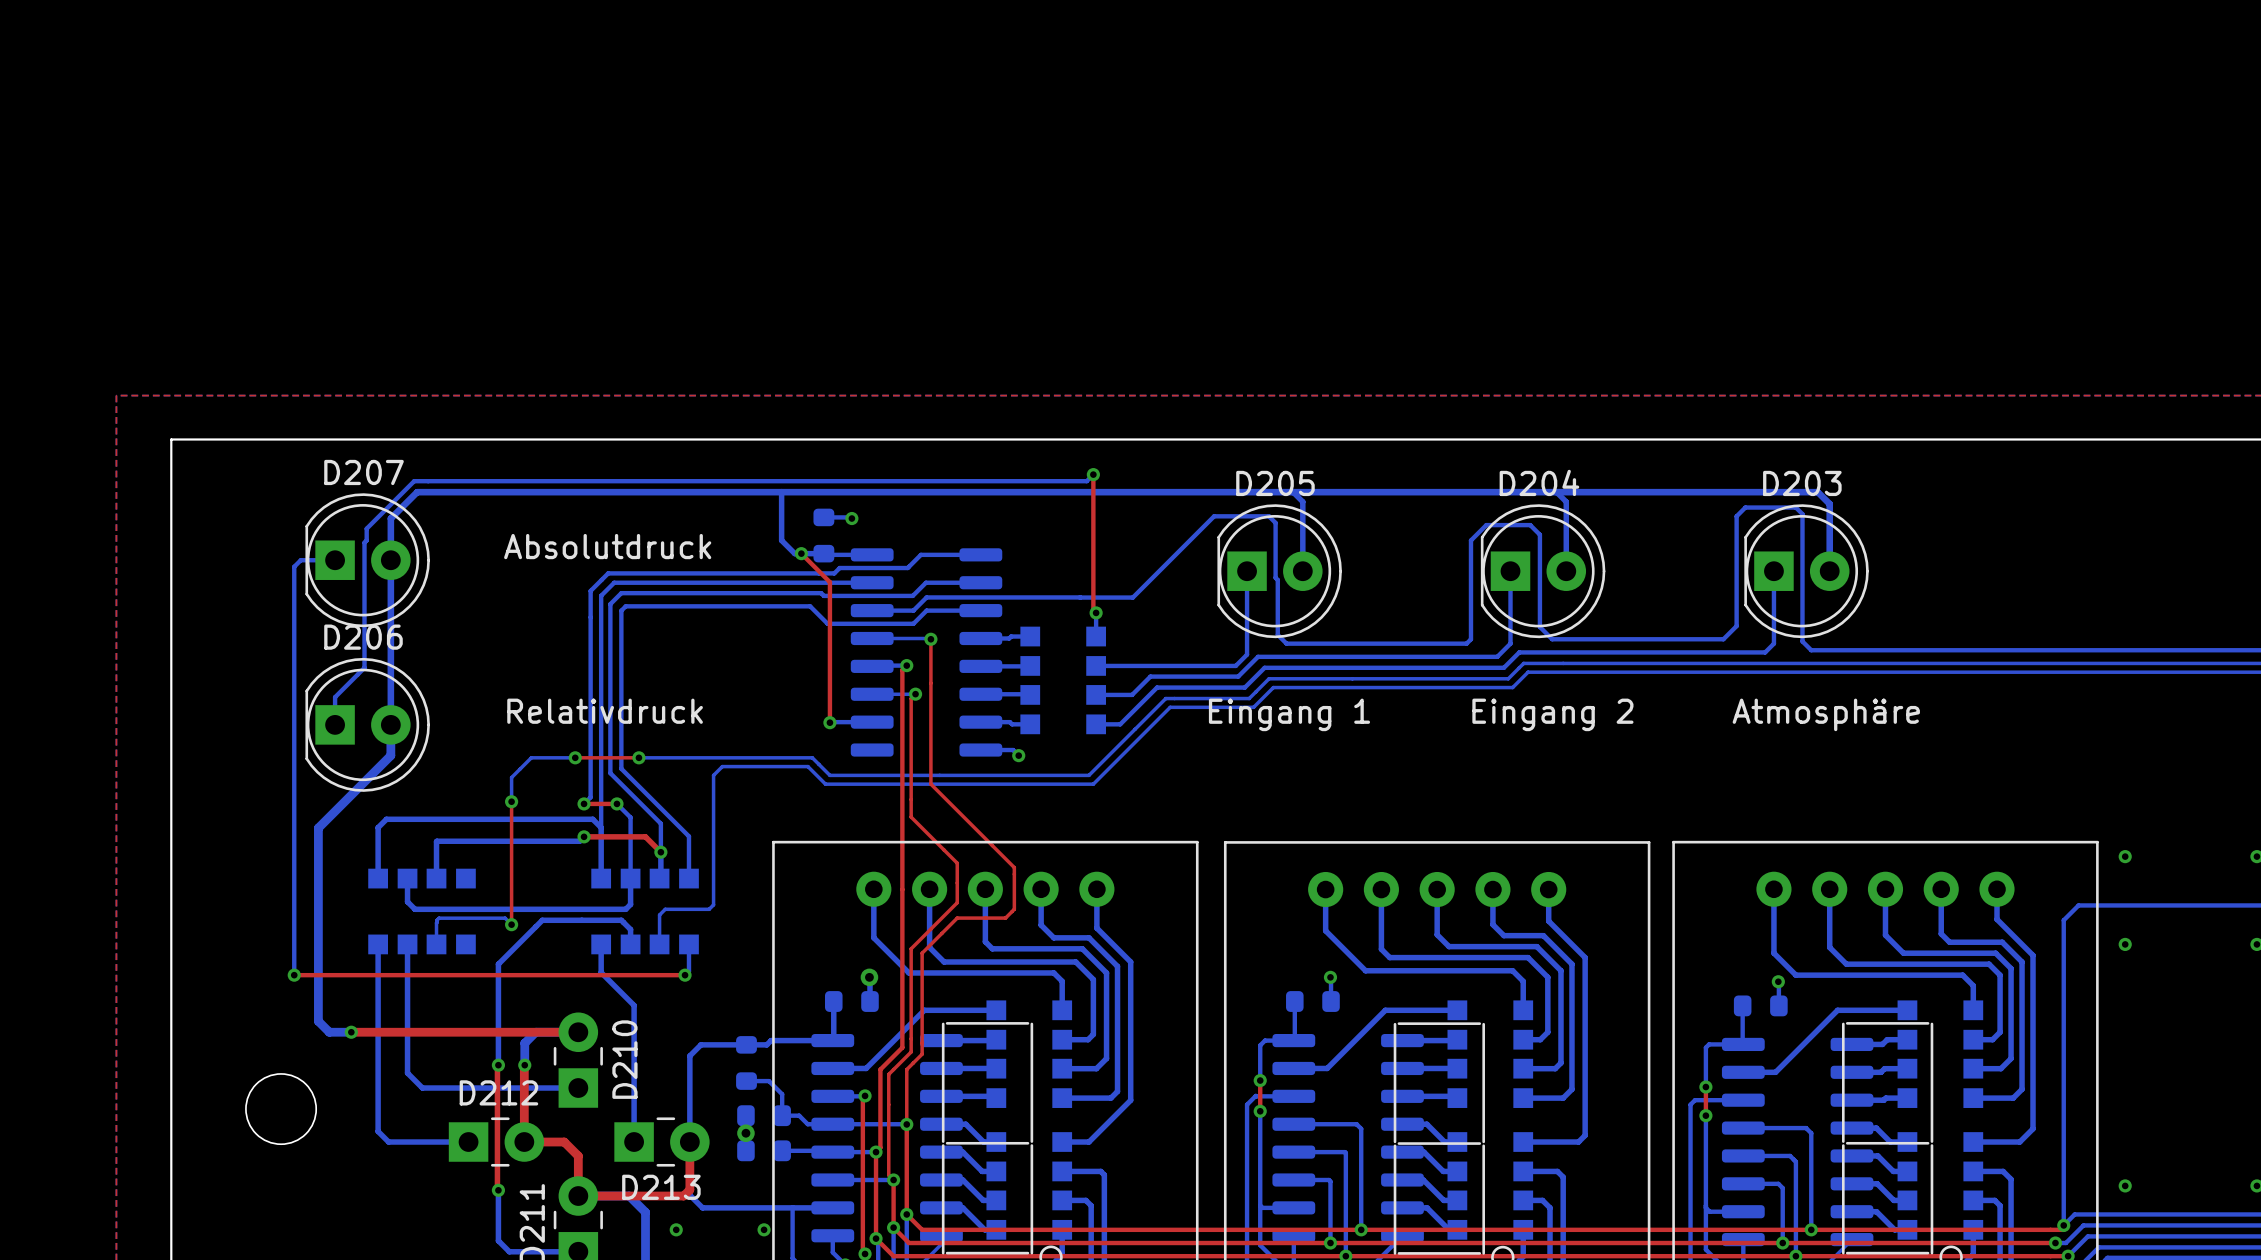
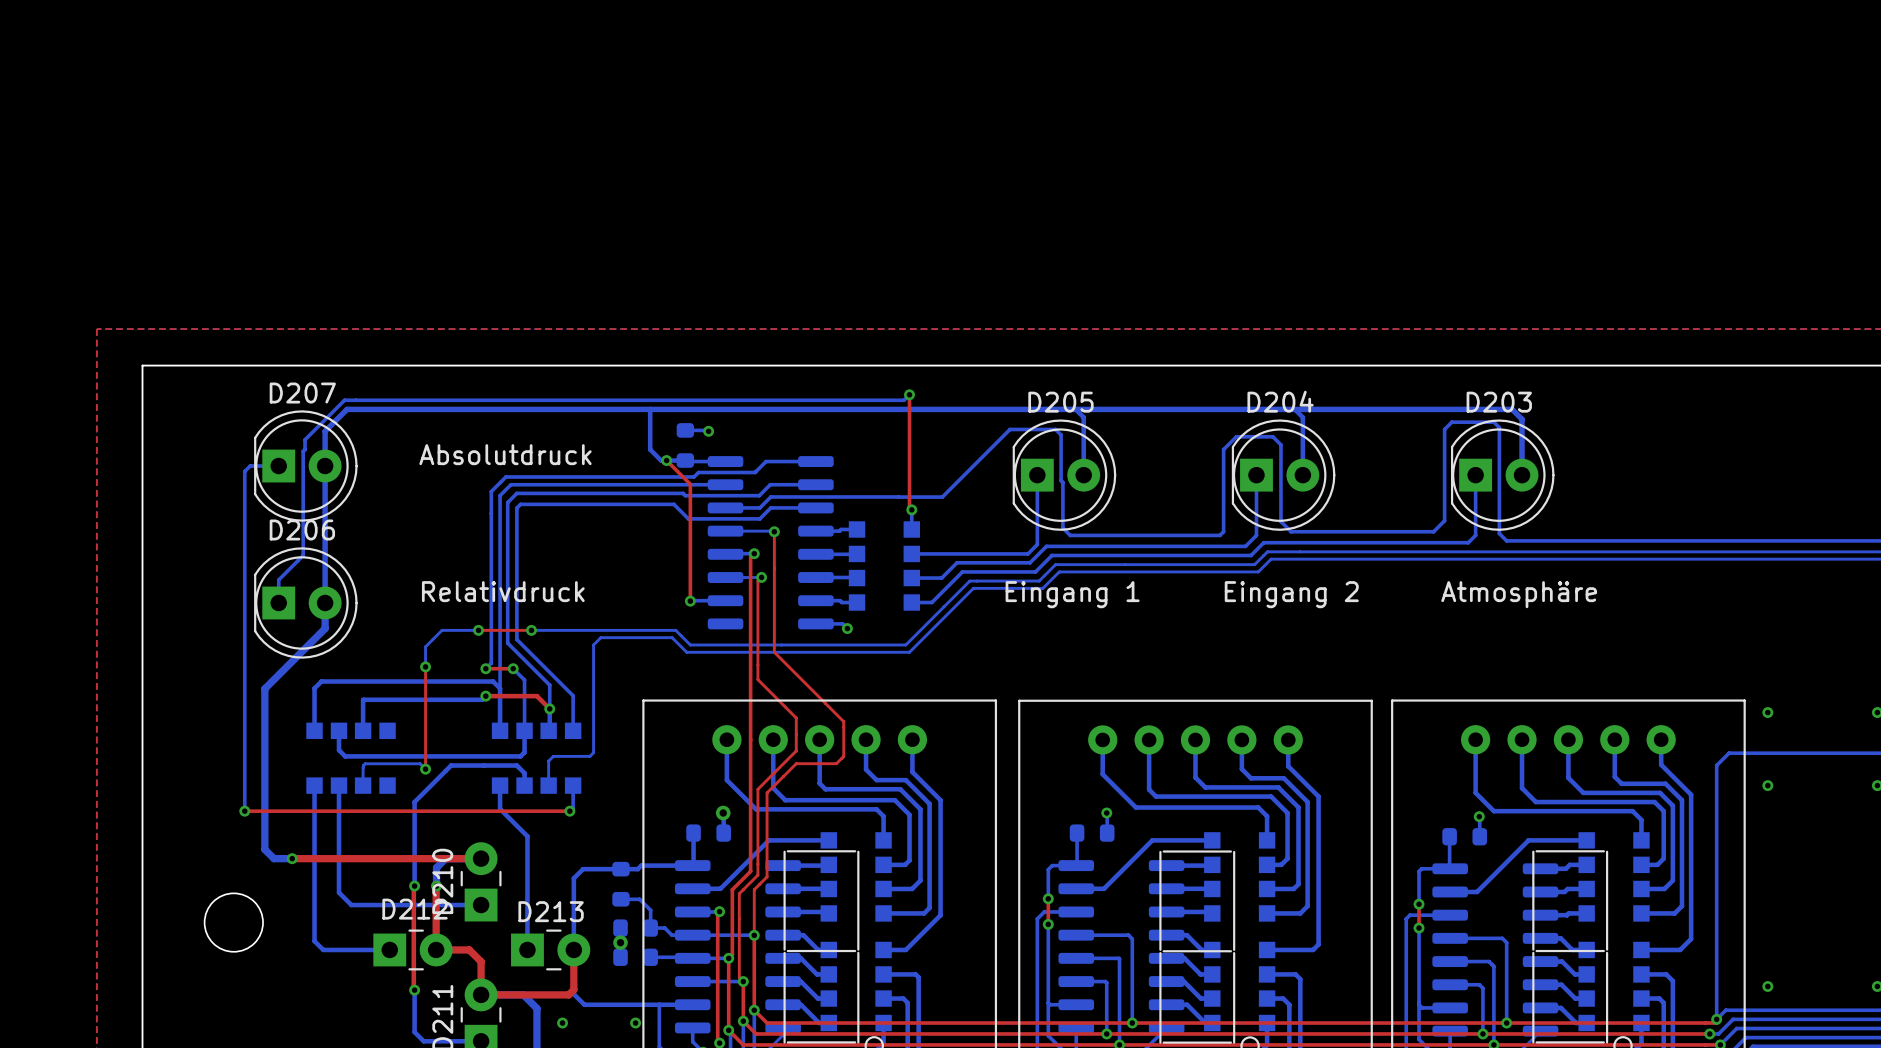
D210 name position: D210 (624, 1059) -> D210 (442, 881)
D213 name position: D213 (661, 1187) -> D213 (551, 911)

